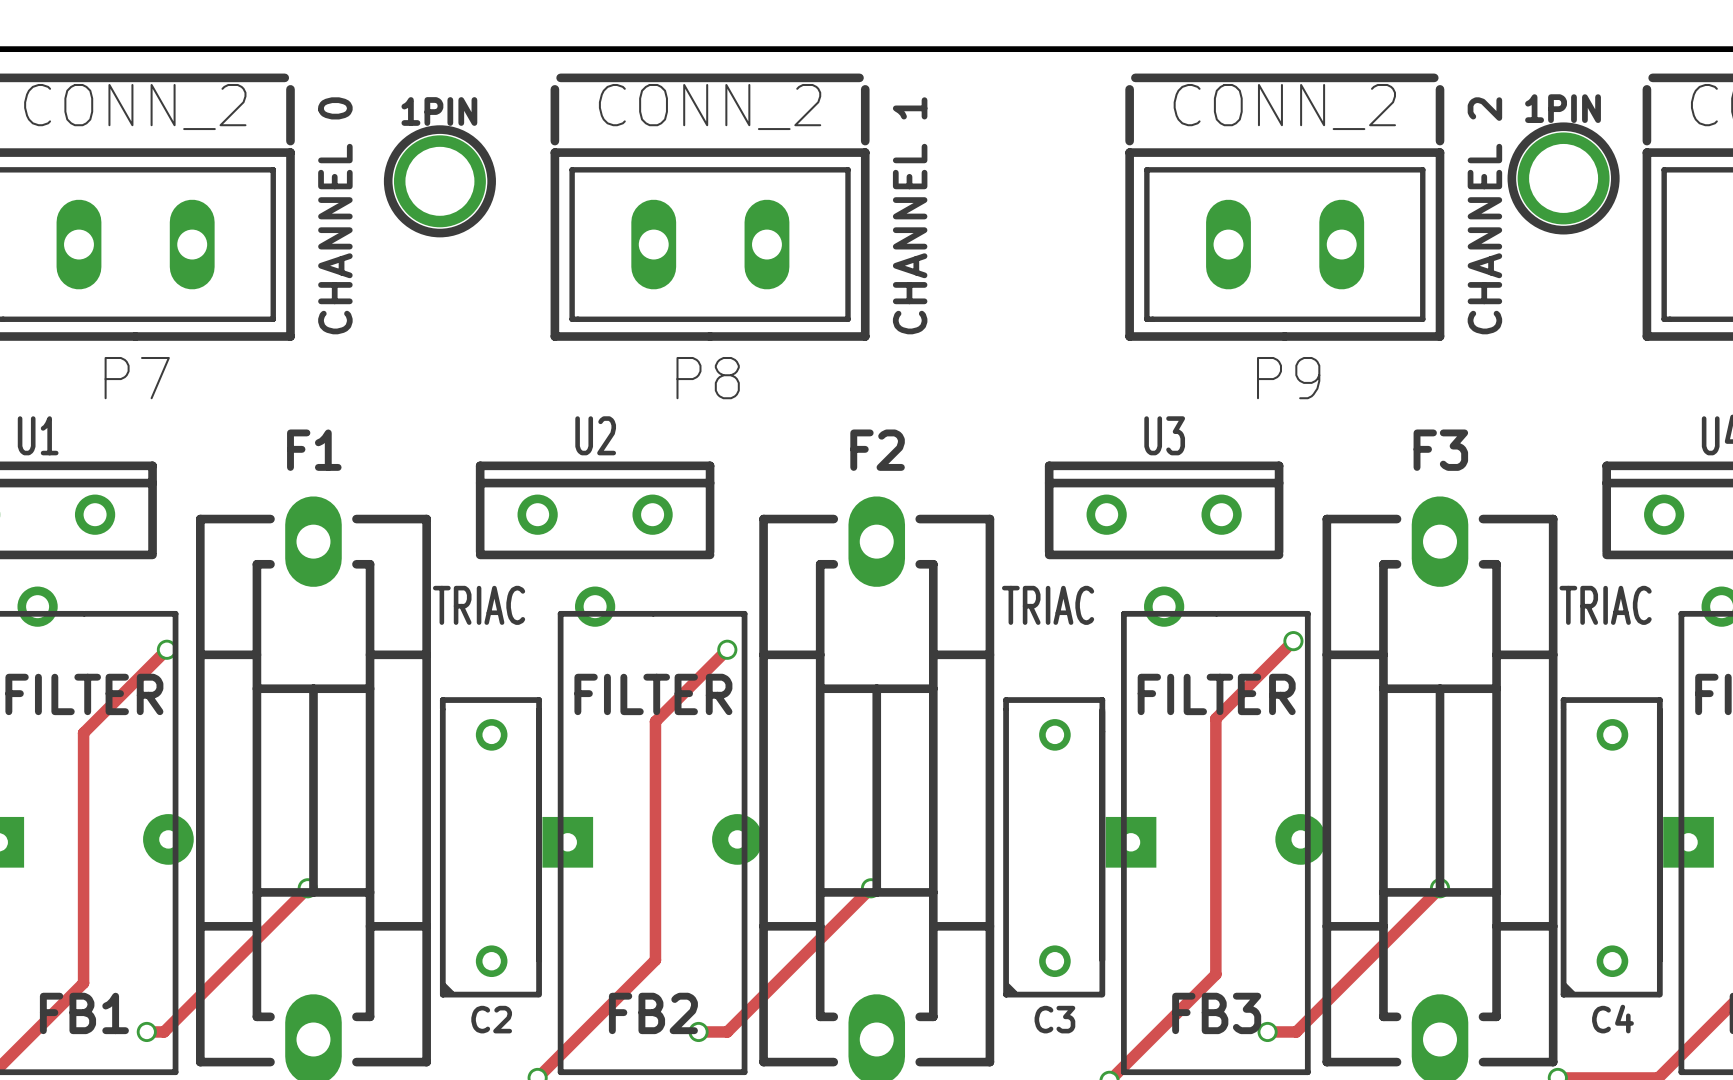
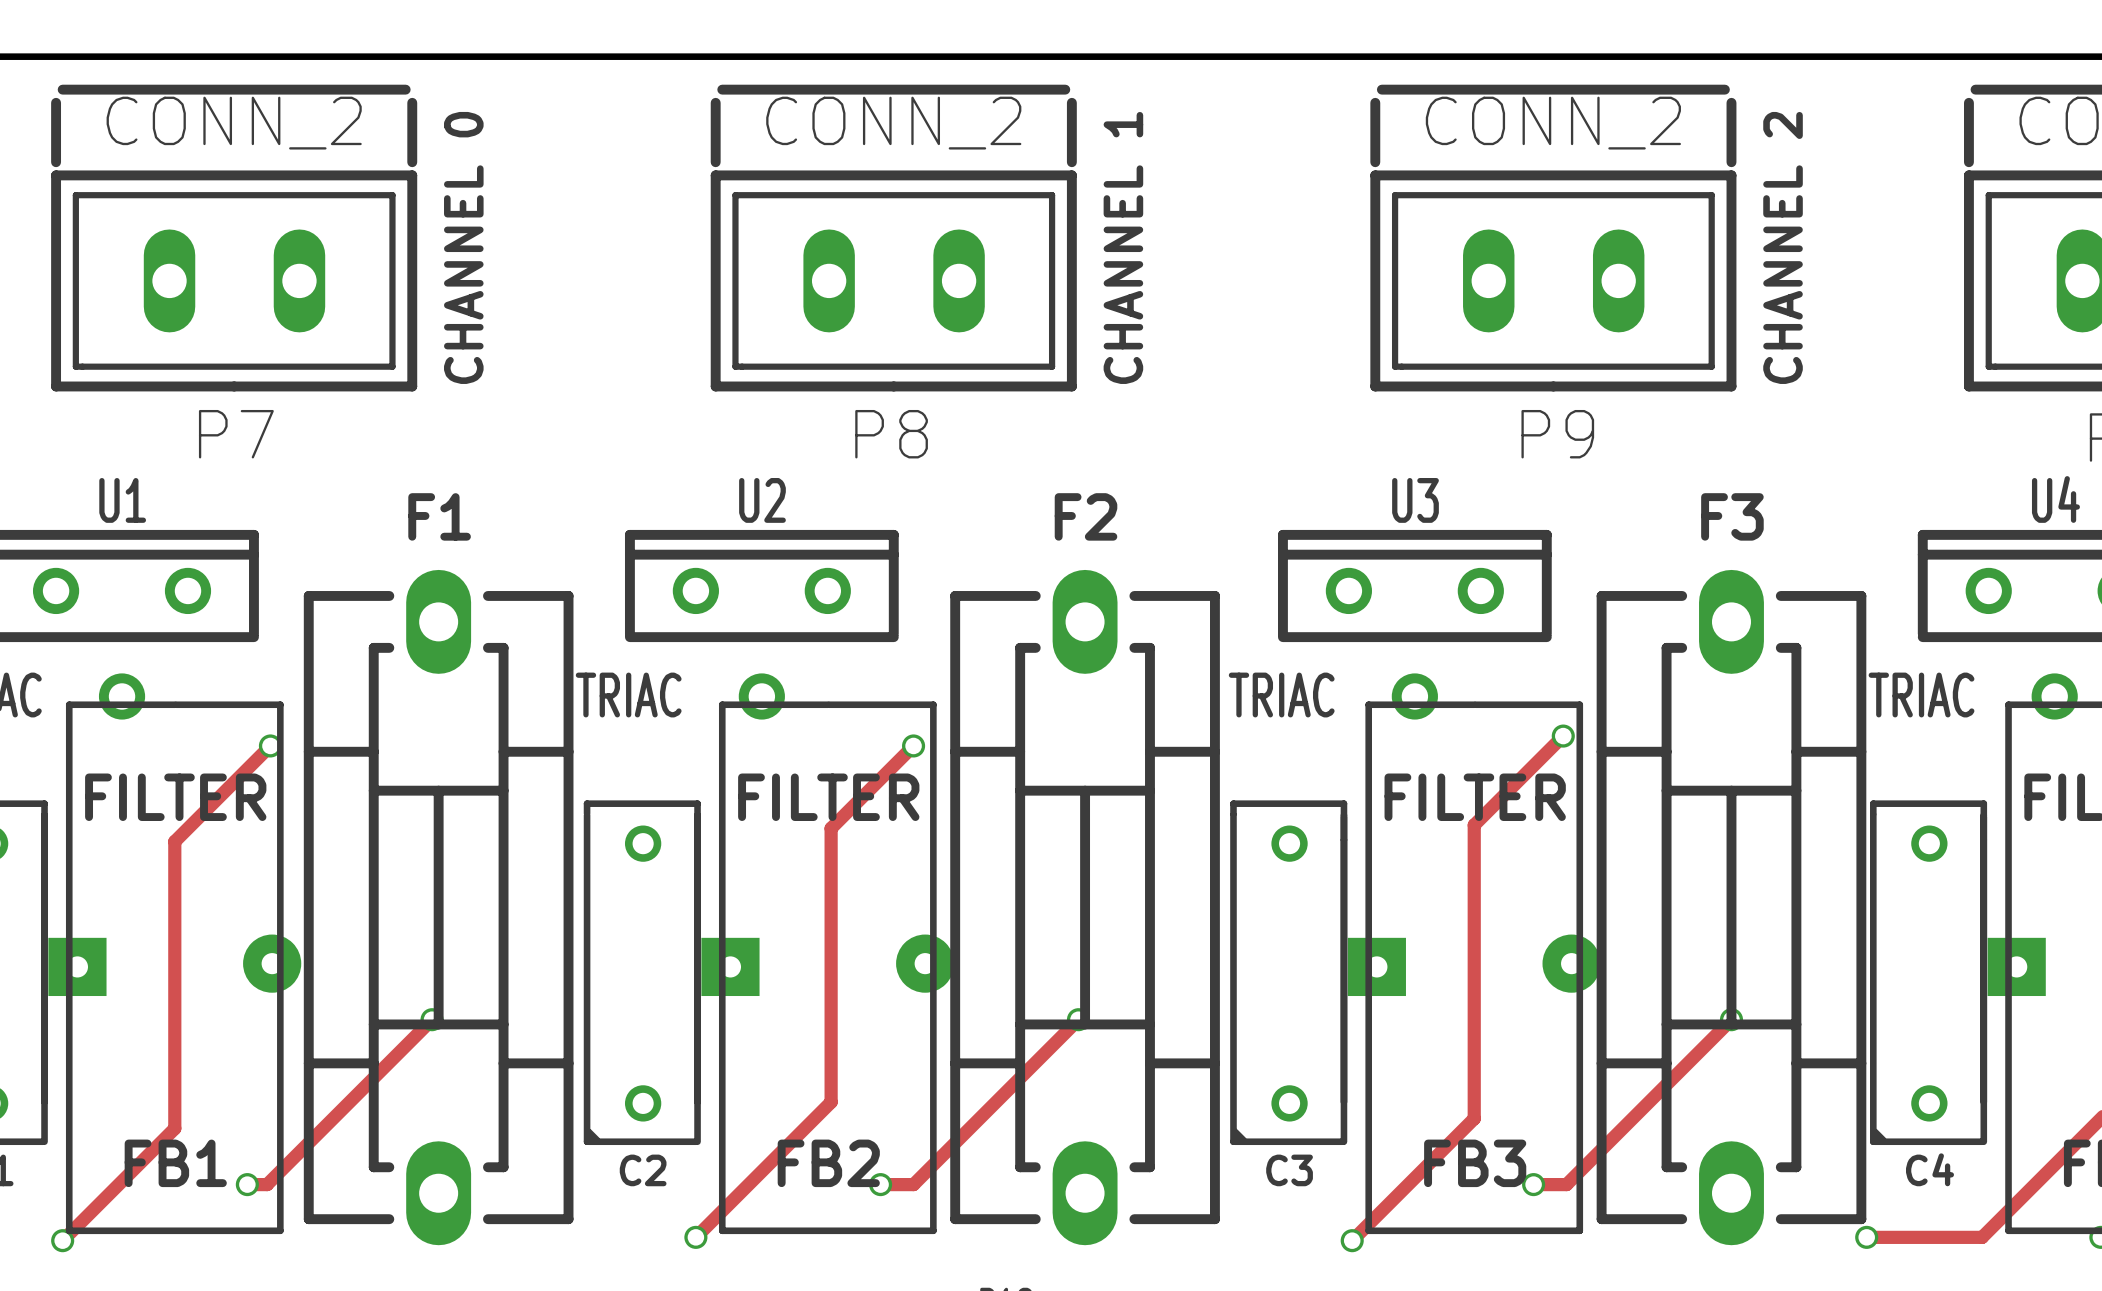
1PIN: (1563, 178) -> none
1PIN: (439, 181) -> none

